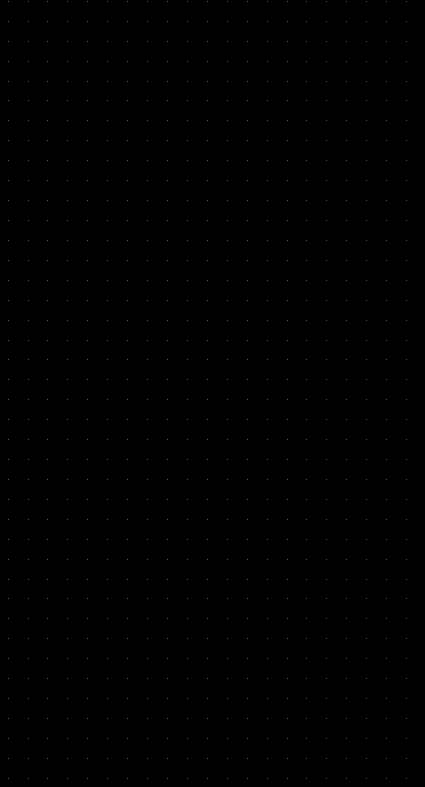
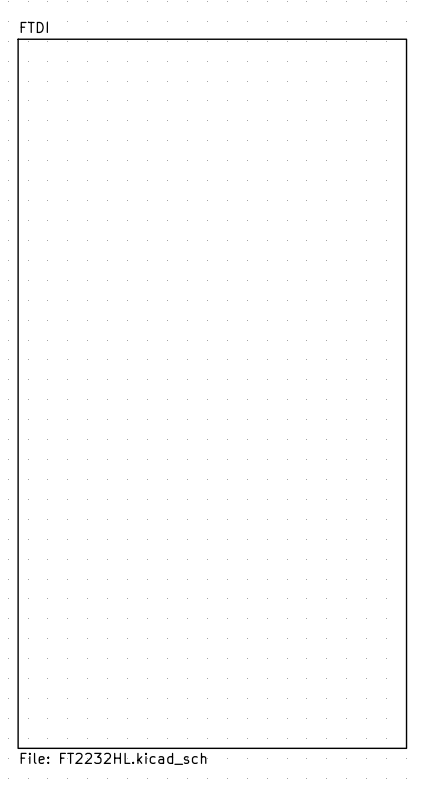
sheet FTDI: none -> File: FT2232HL.kicad_sch (212, 393)

